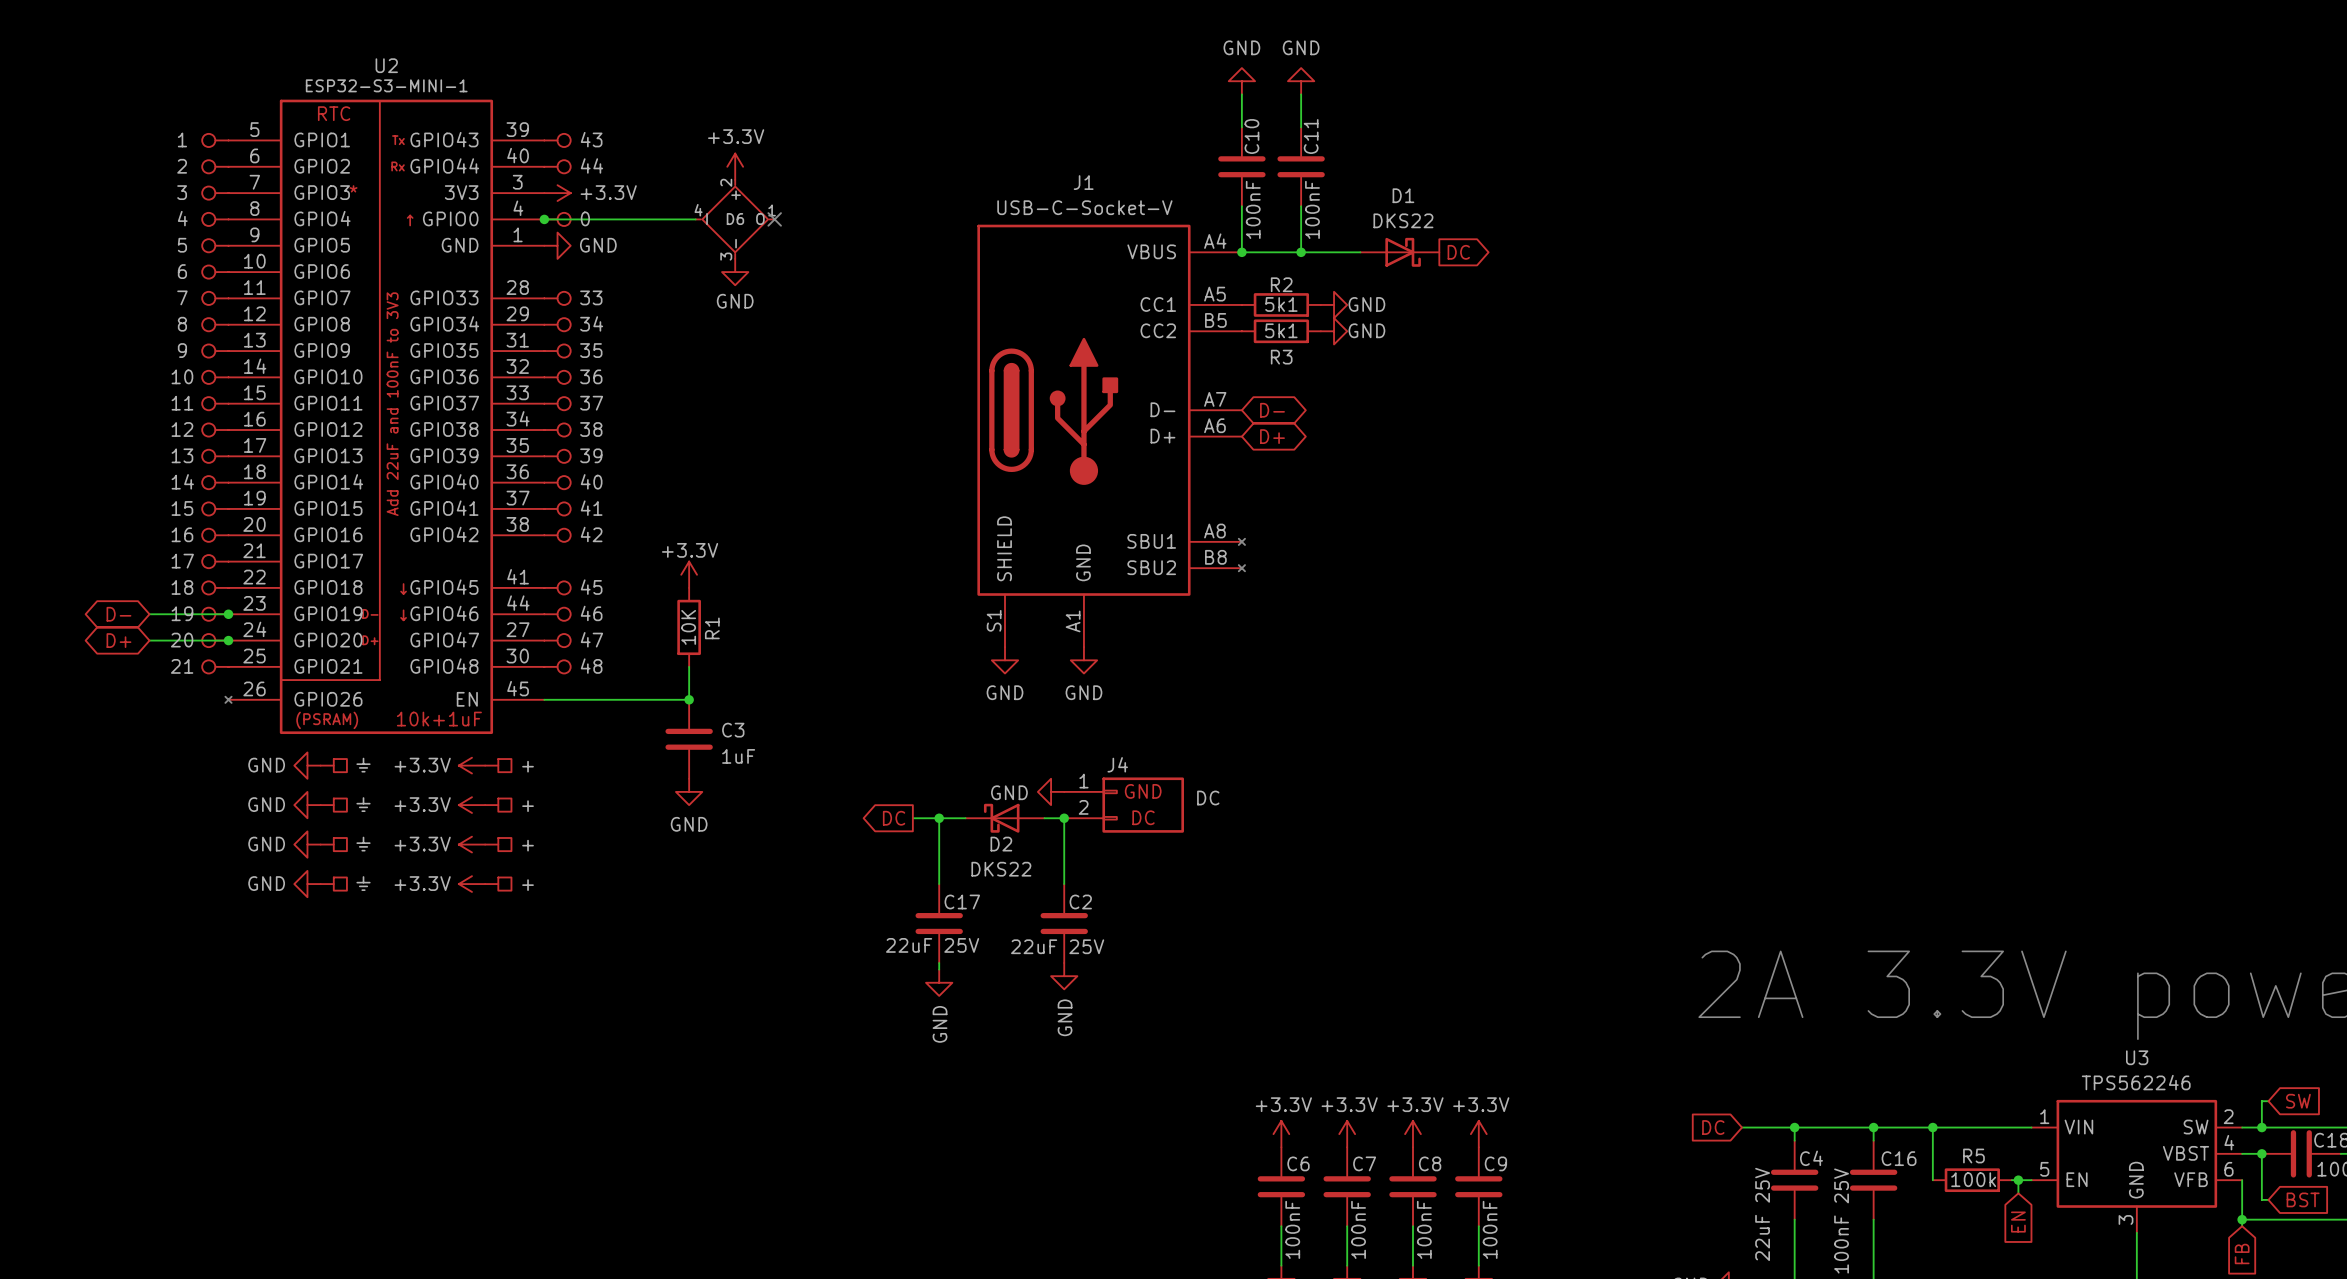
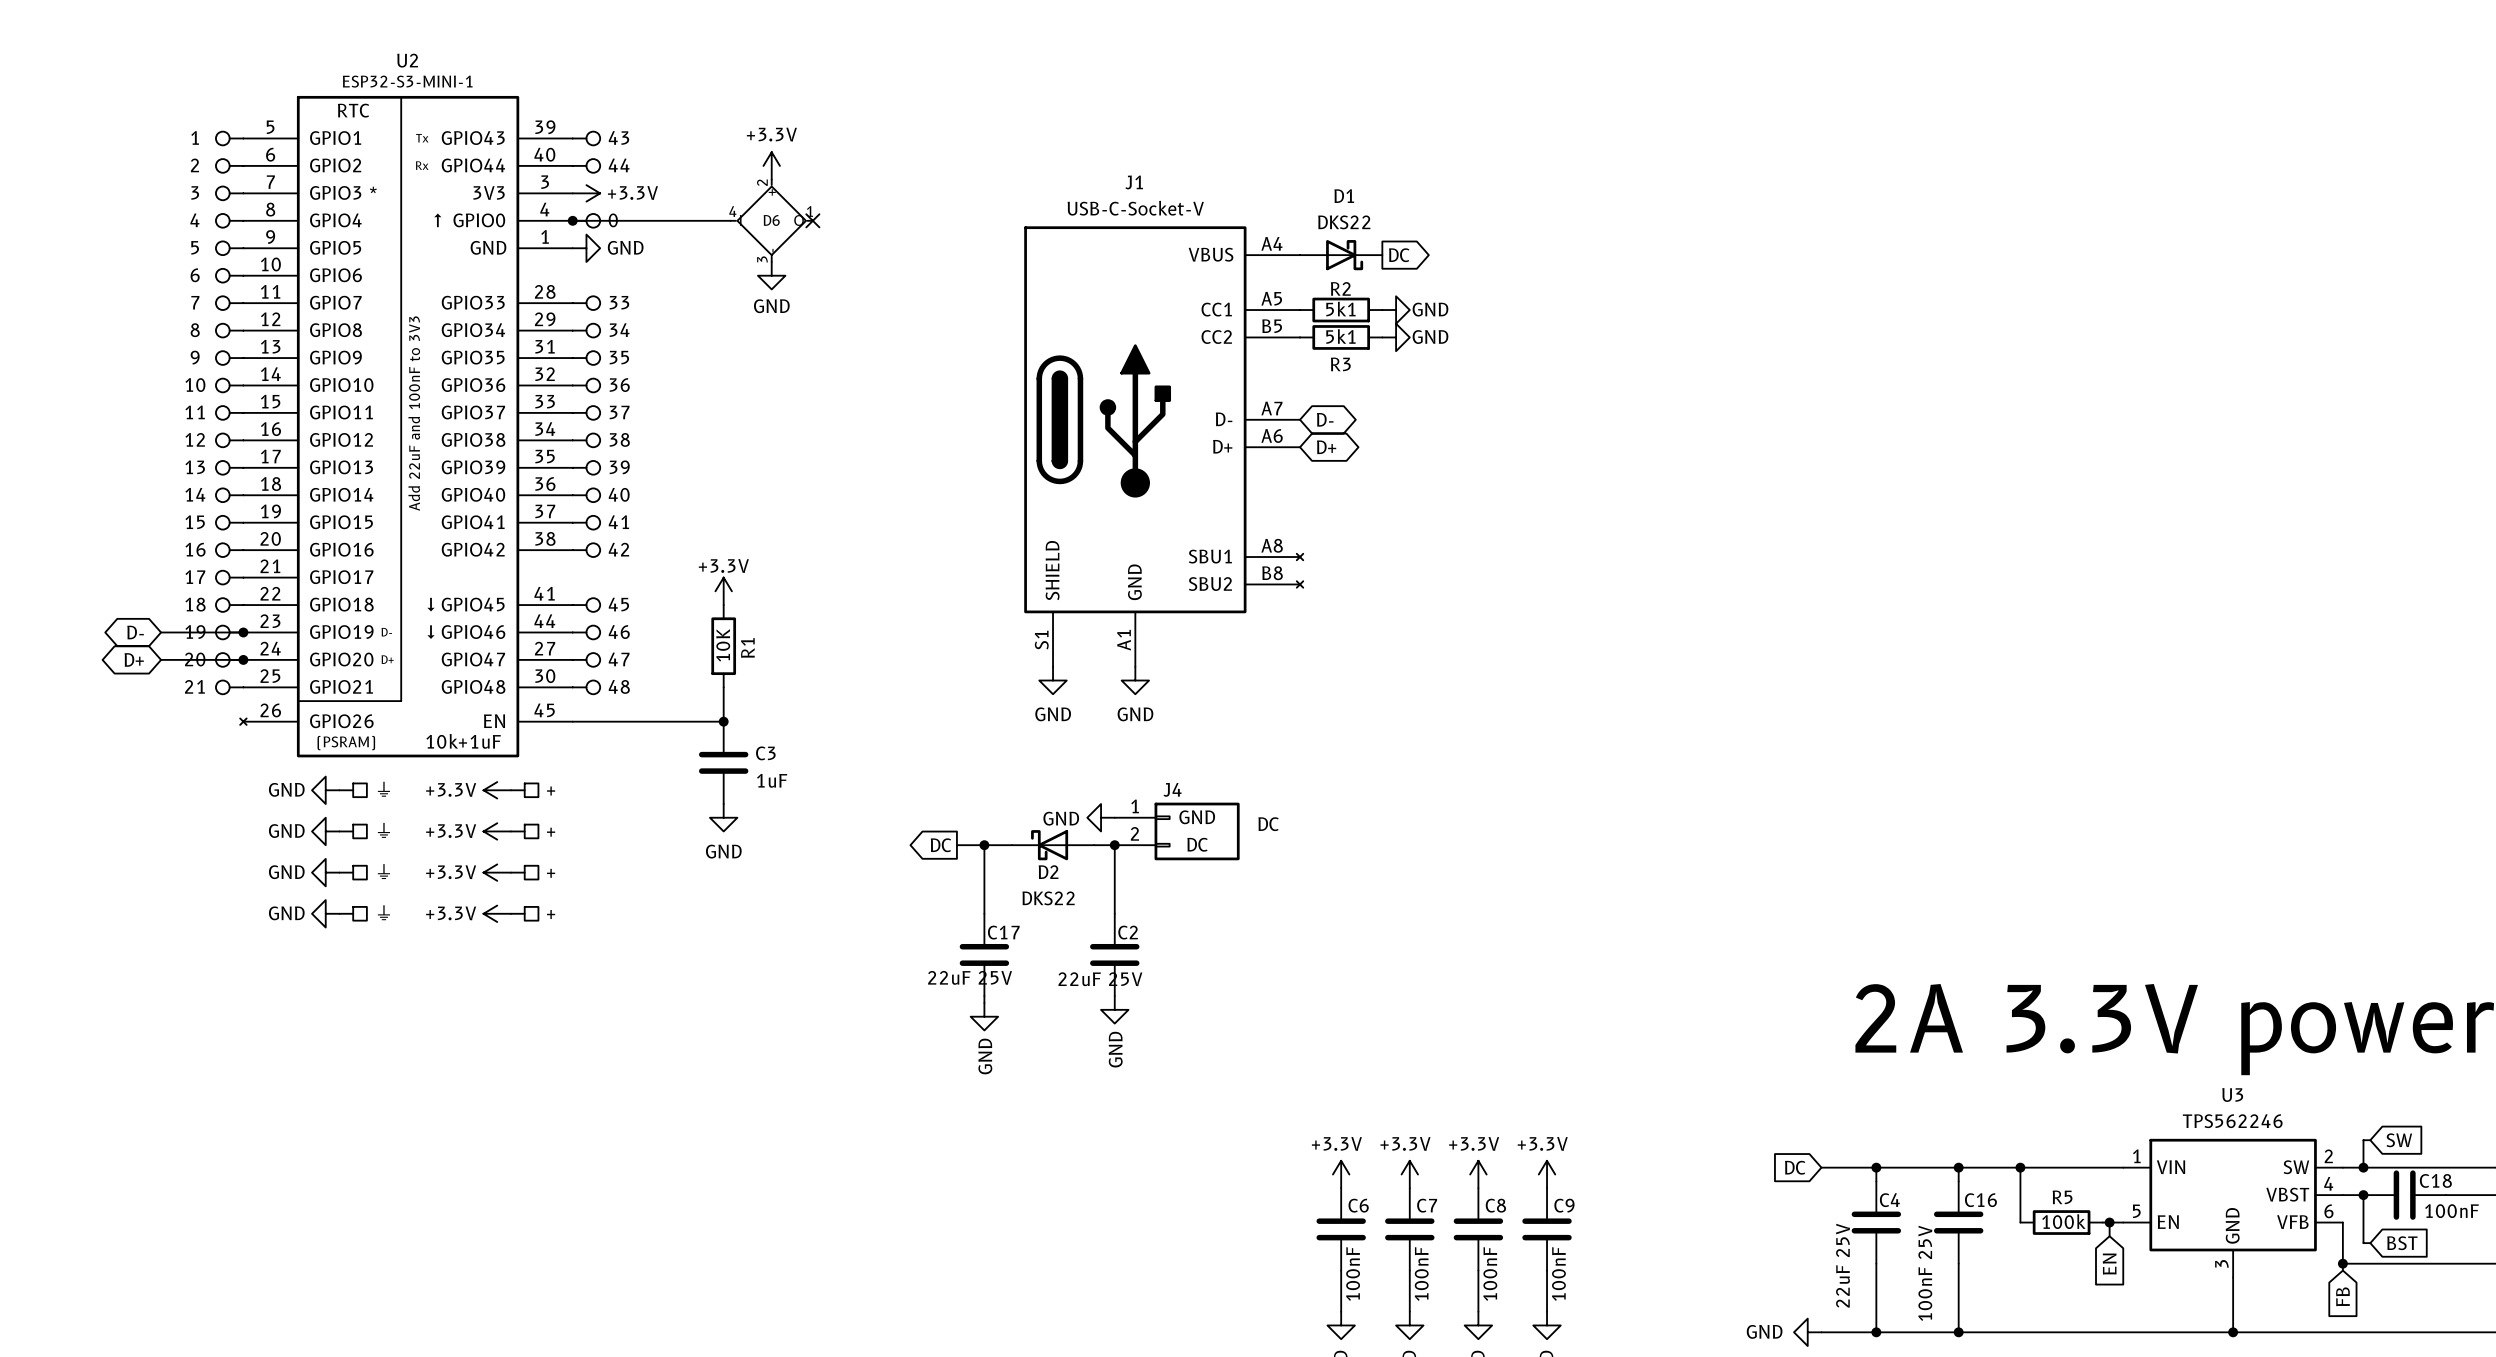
power symbol: GND (1241, 81) -> none
power symbol: GND (1301, 81) -> none
wire: (1241, 94) (1241, 127) -> none
wire: (1301, 94) (1301, 127) -> none
C10: 100nF (1241, 166) -> none
C11: 100nF (1301, 166) -> none
wire: (1241, 206) (1241, 252) (1360, 252) -> none
wire: (1301, 206) (1301, 252) -> none
junction: (1241, 252) -> none
junction: (1301, 252) -> none
D1 position: (1399, 252) -> (1341, 255)
global label position: DC (1458, 252) -> DC (1399, 255)

